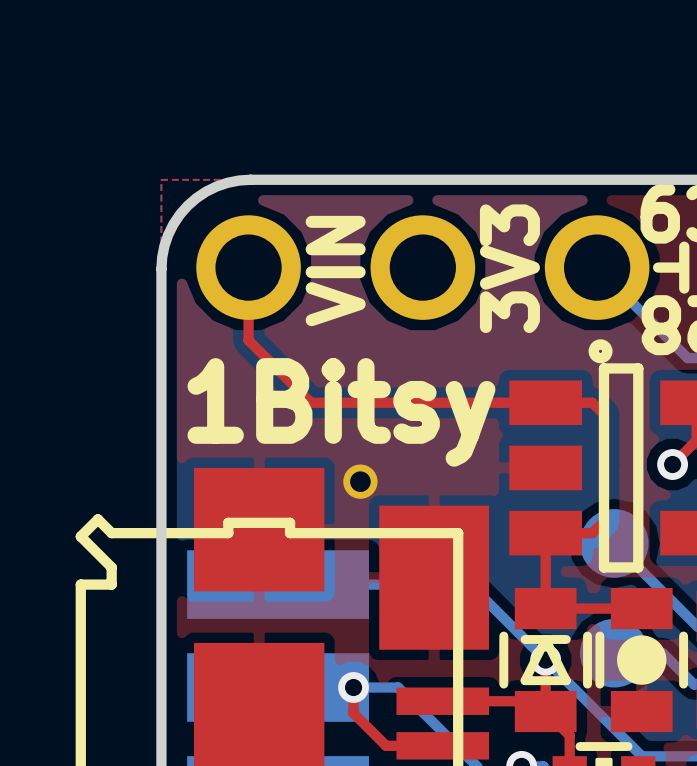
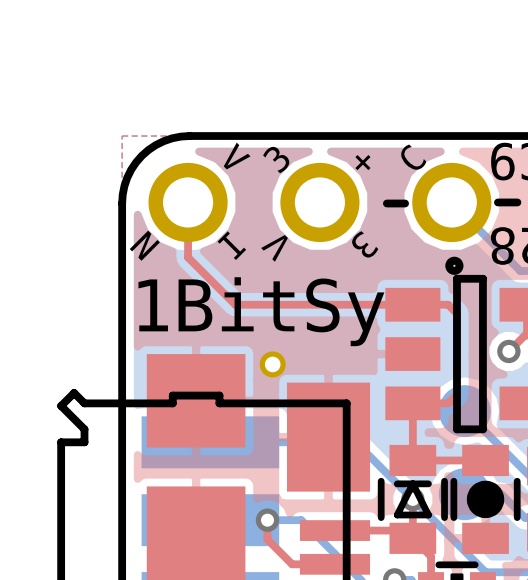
text: none -> V (237, 156)
text: none -> C (413, 157)
text: none -> 3 (276, 159)
text: none -> + (362, 162)
line: (684, 246) (684, 288) -> none
text: 3V3 (509, 268) -> none
line: none -> (386, 203) (405, 203)
text: VIN (335, 271) -> none
text: none -> N (144, 245)
text: none -> I (231, 245)
text: none -> 3 (365, 244)
text: none -> V (274, 248)
text: 1Bitsy (341, 412) -> 1BitSy (261, 311)

